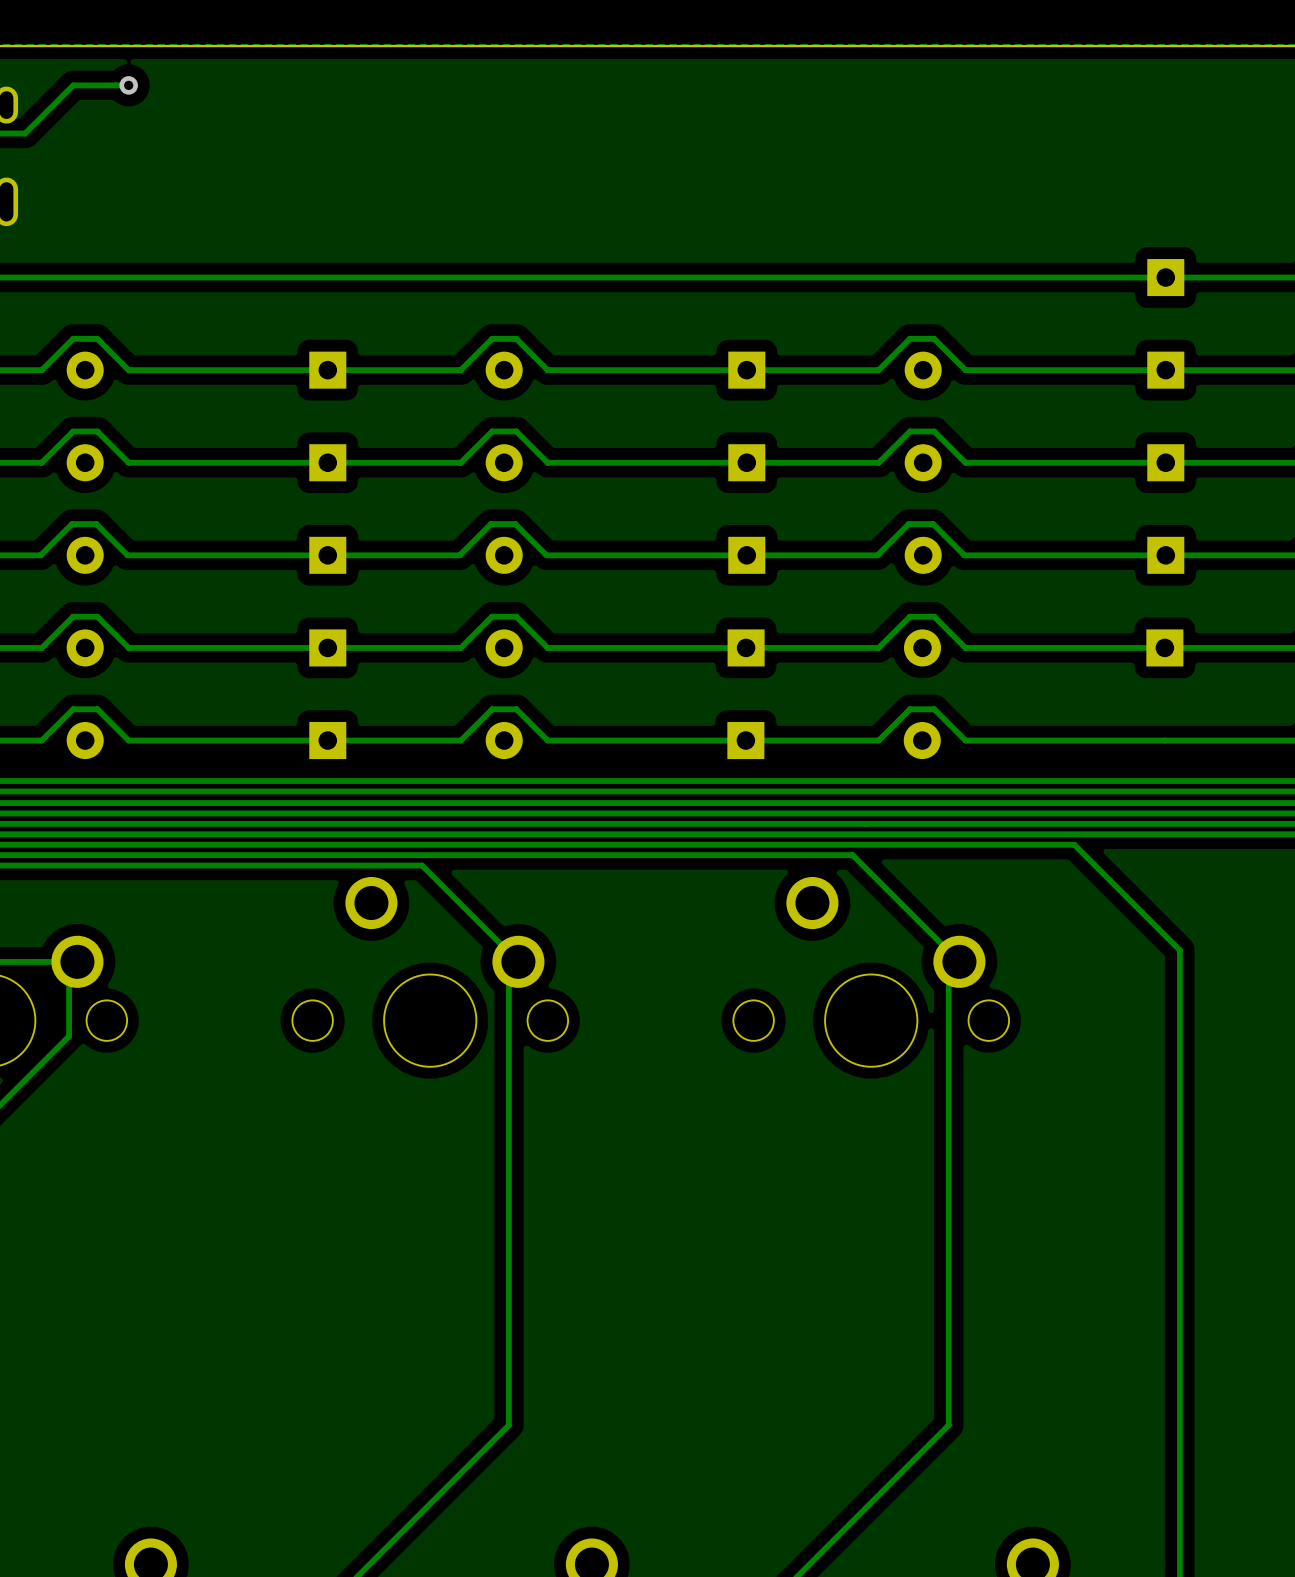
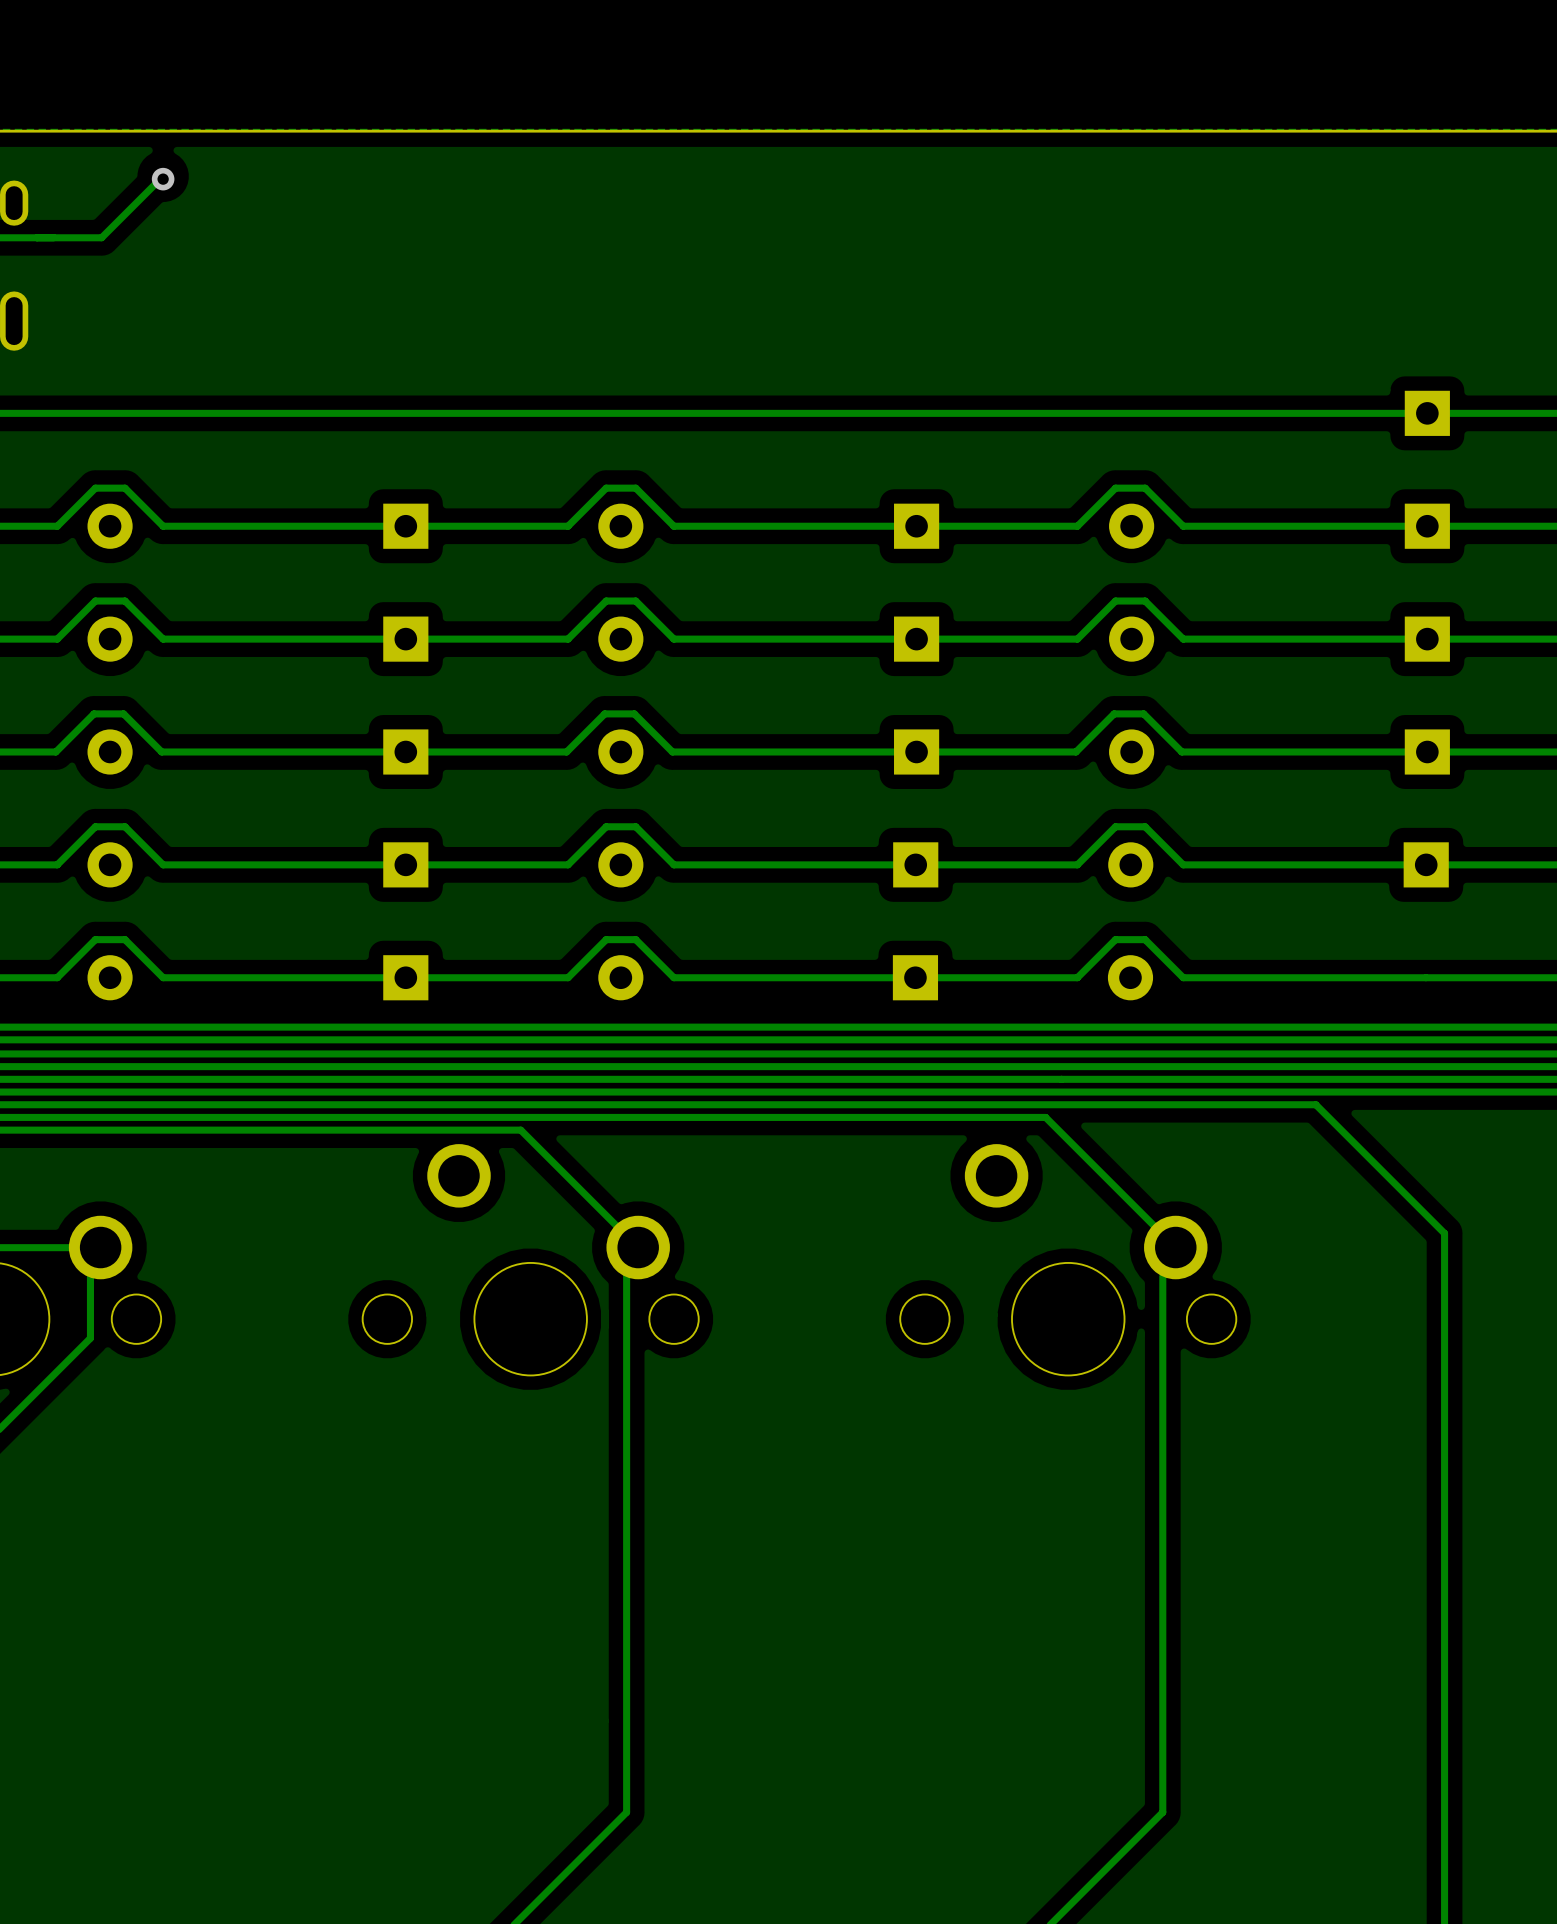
track: (128, 85) (73, 85) (25, 133) -> (163, 176) (101, 237) (36, 237)

